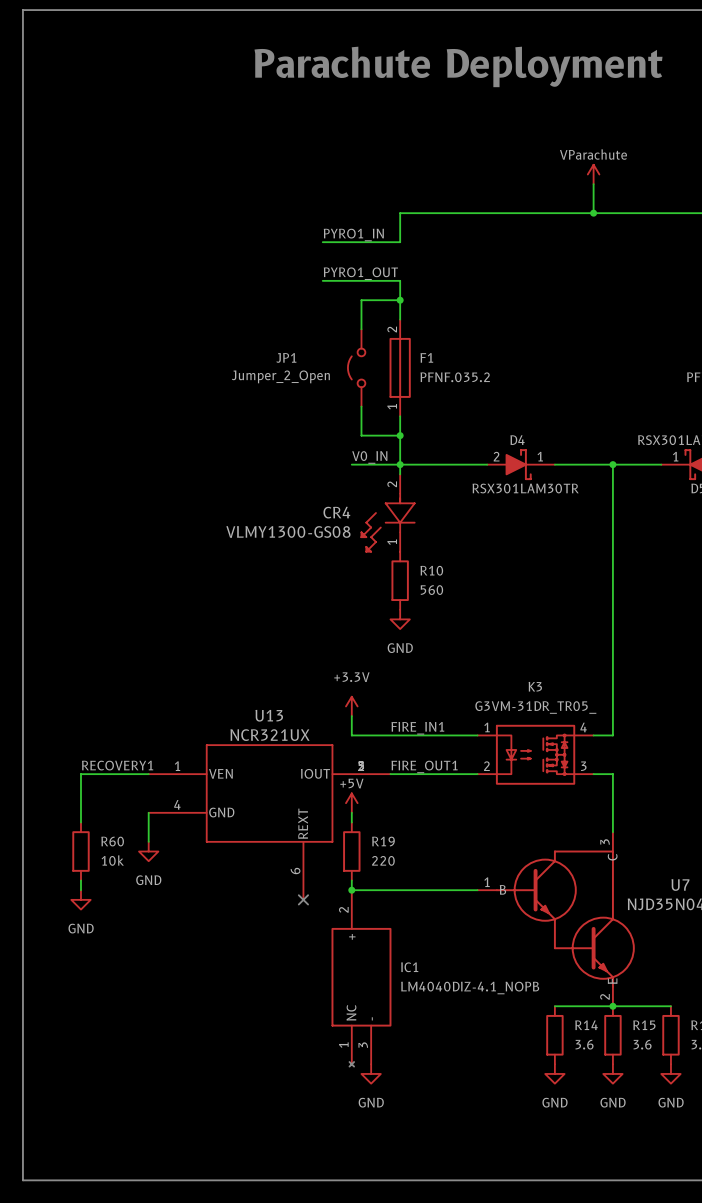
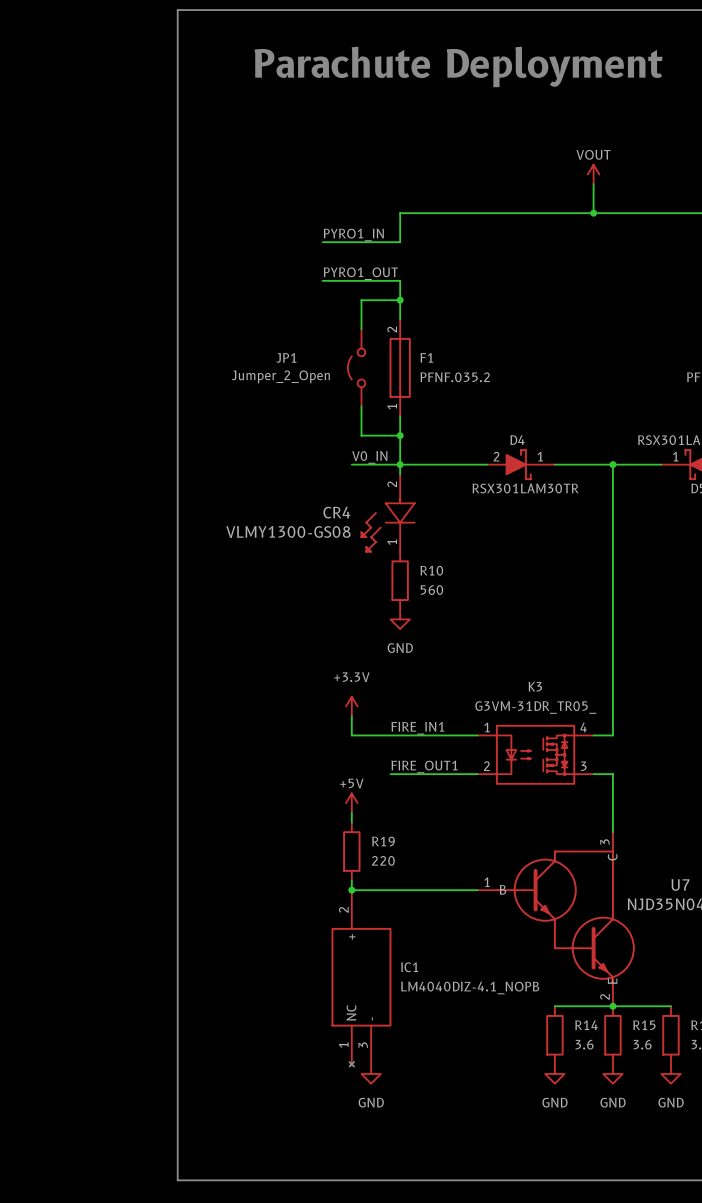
line: (177, 10) (22, 10) (22, 1180) (177, 1180) -> (177, 10) (177, 1180)
power symbol: VParachute (593, 174) -> VOUT (593, 174)
label: RECOVERY1 (117, 765) -> none
wire: (148, 774) (80, 774) (80, 822) -> none
wire: (148, 812) (148, 841) -> none
U13: NCR321UX (269, 822) -> none
R60: 10k (80, 851) -> none
power symbol: GND (148, 851) -> none
wire: (80, 880) (80, 890) -> none
power symbol: GND (80, 899) -> none
no-connect mark: (303, 899) -> none

